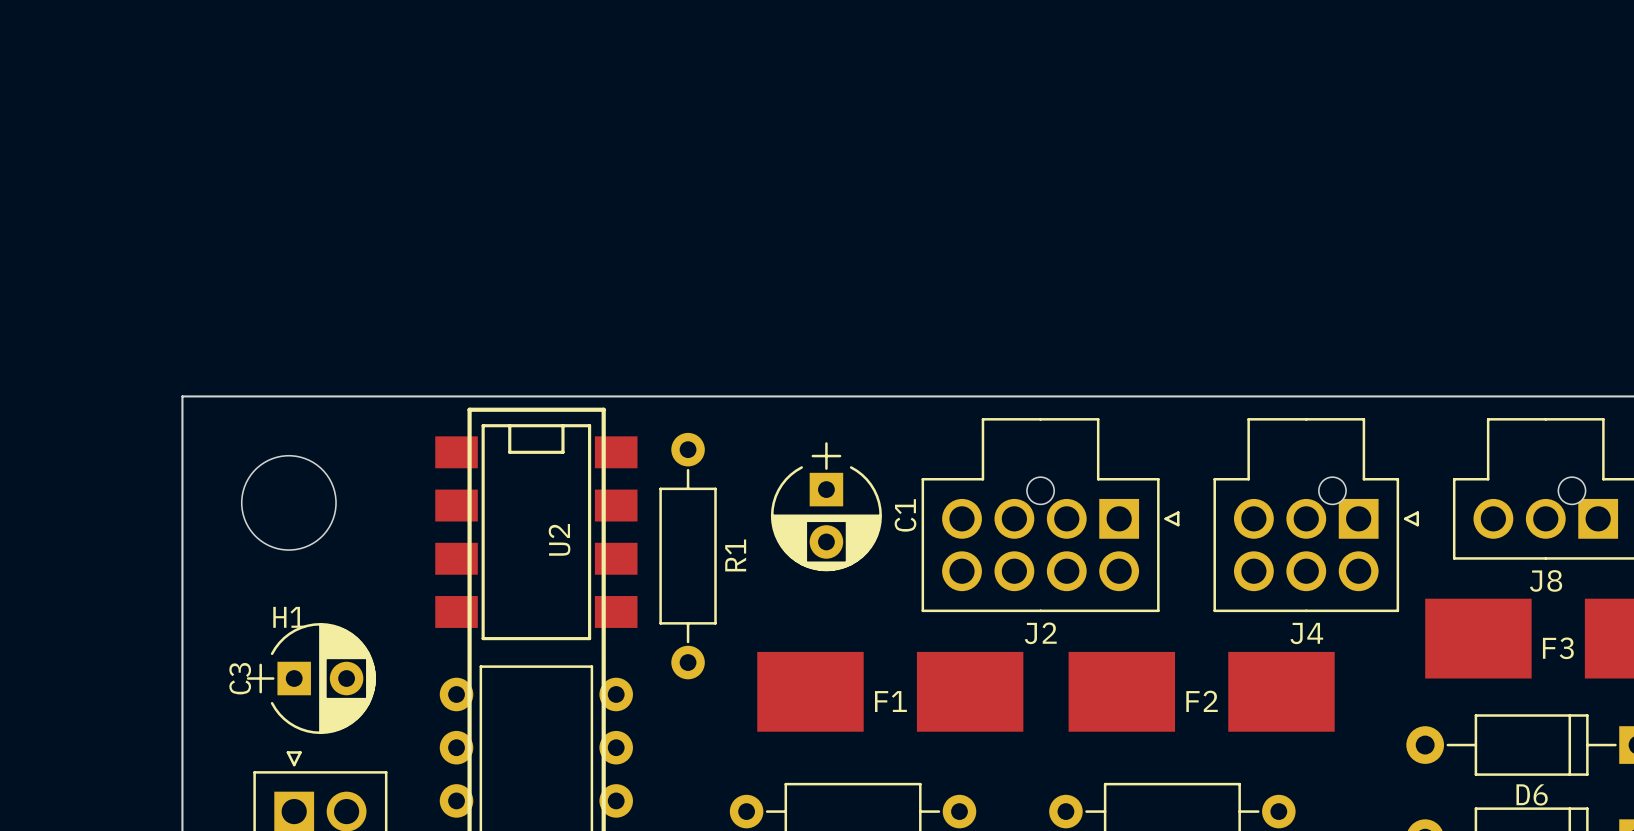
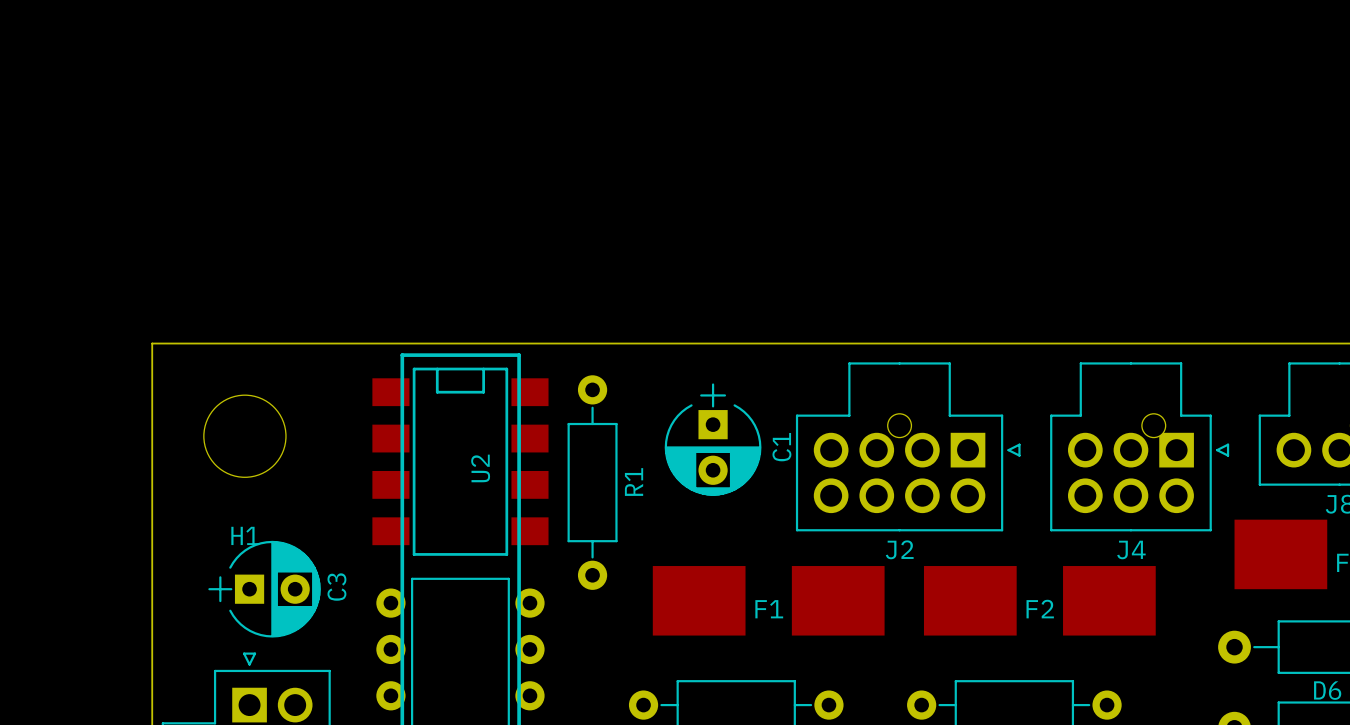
C3 name position: C3 (240, 678) -> C3 (336, 587)

